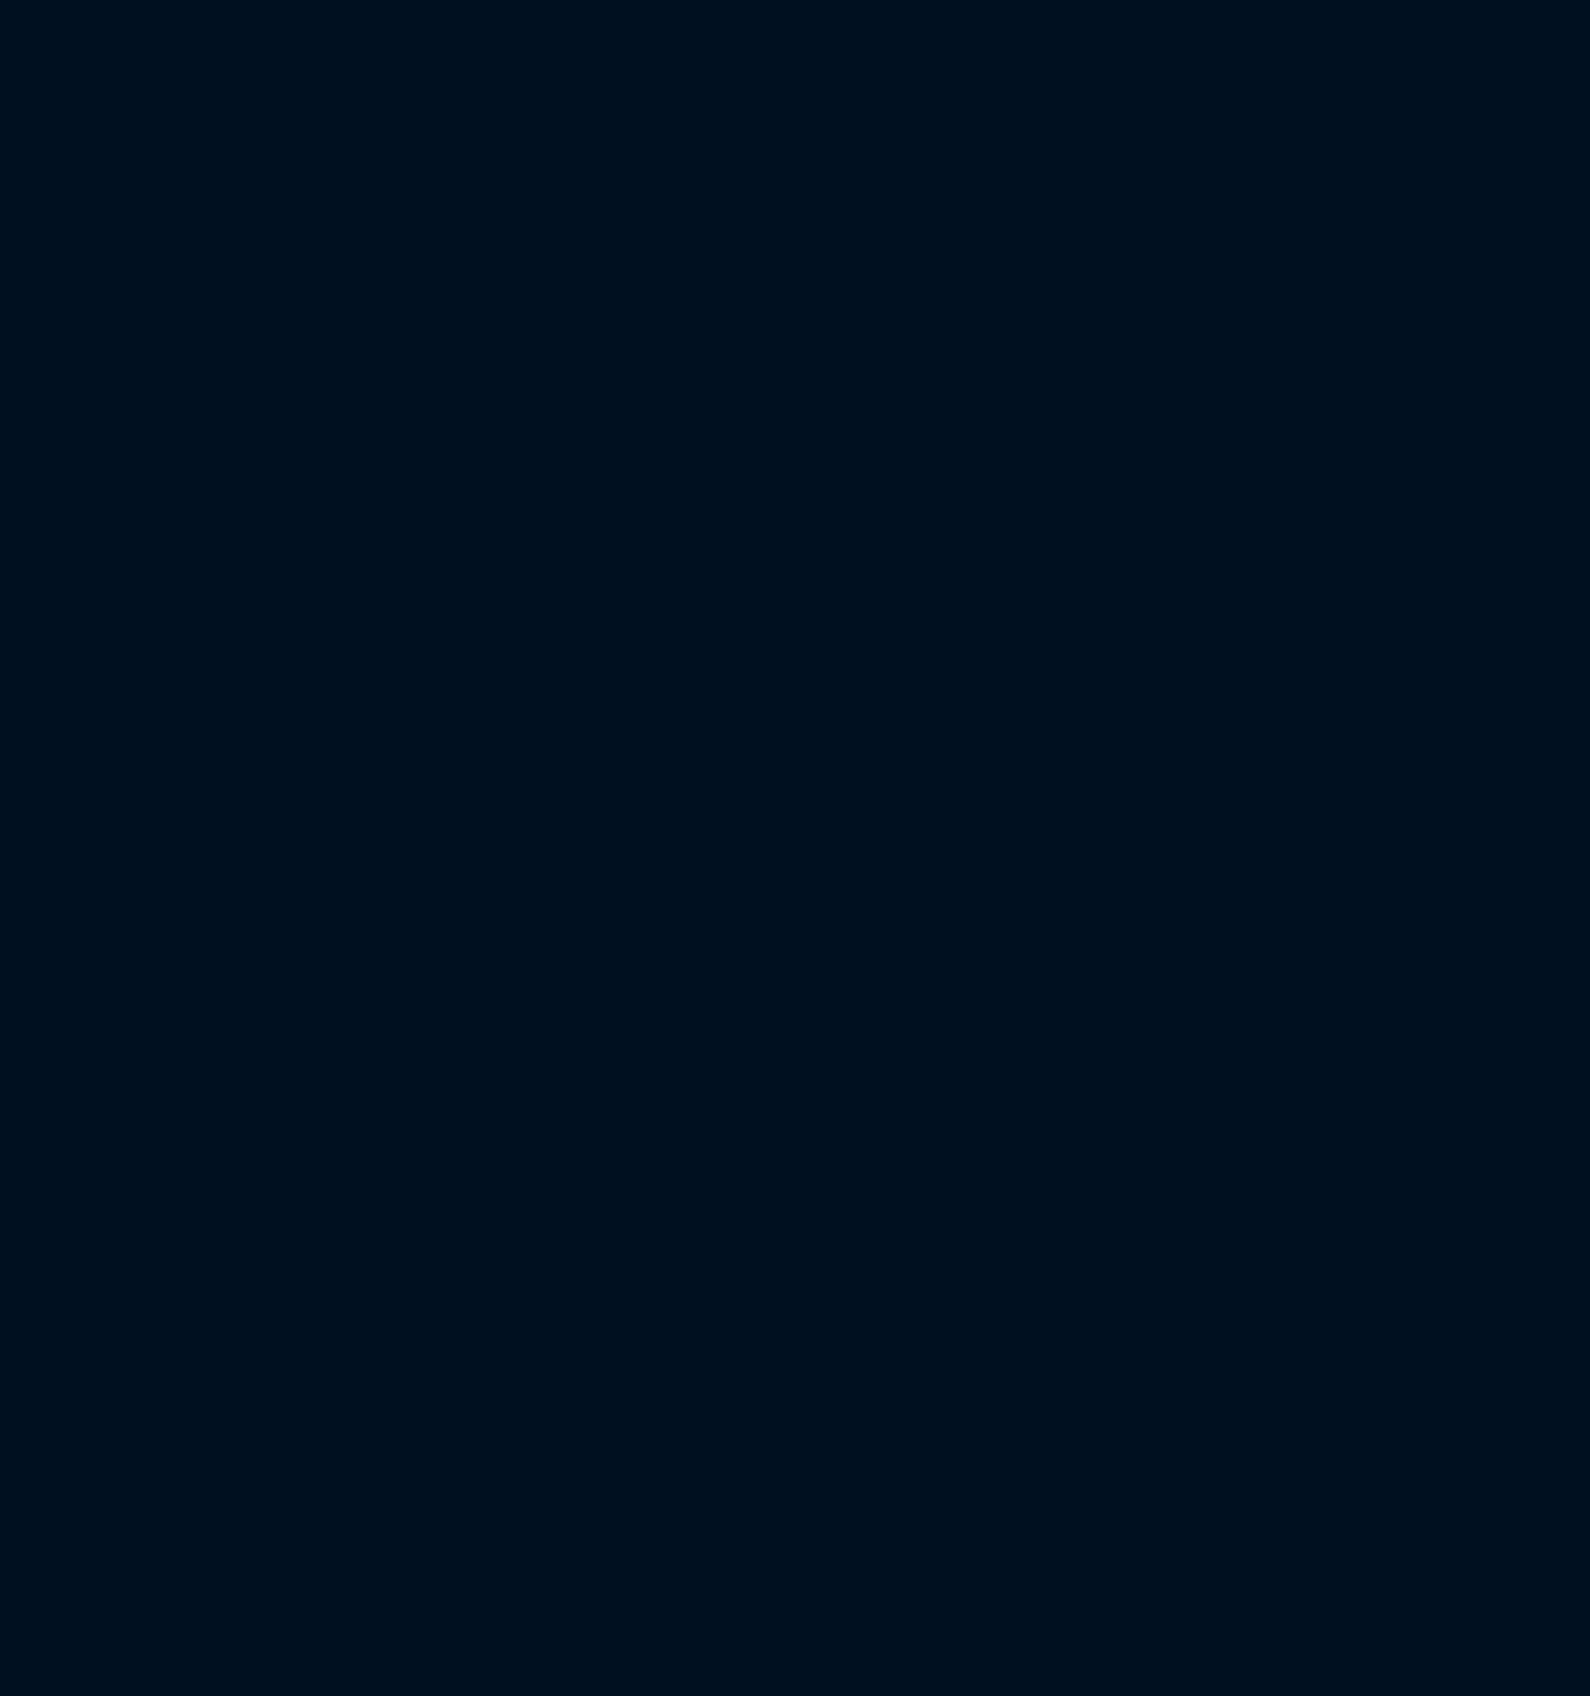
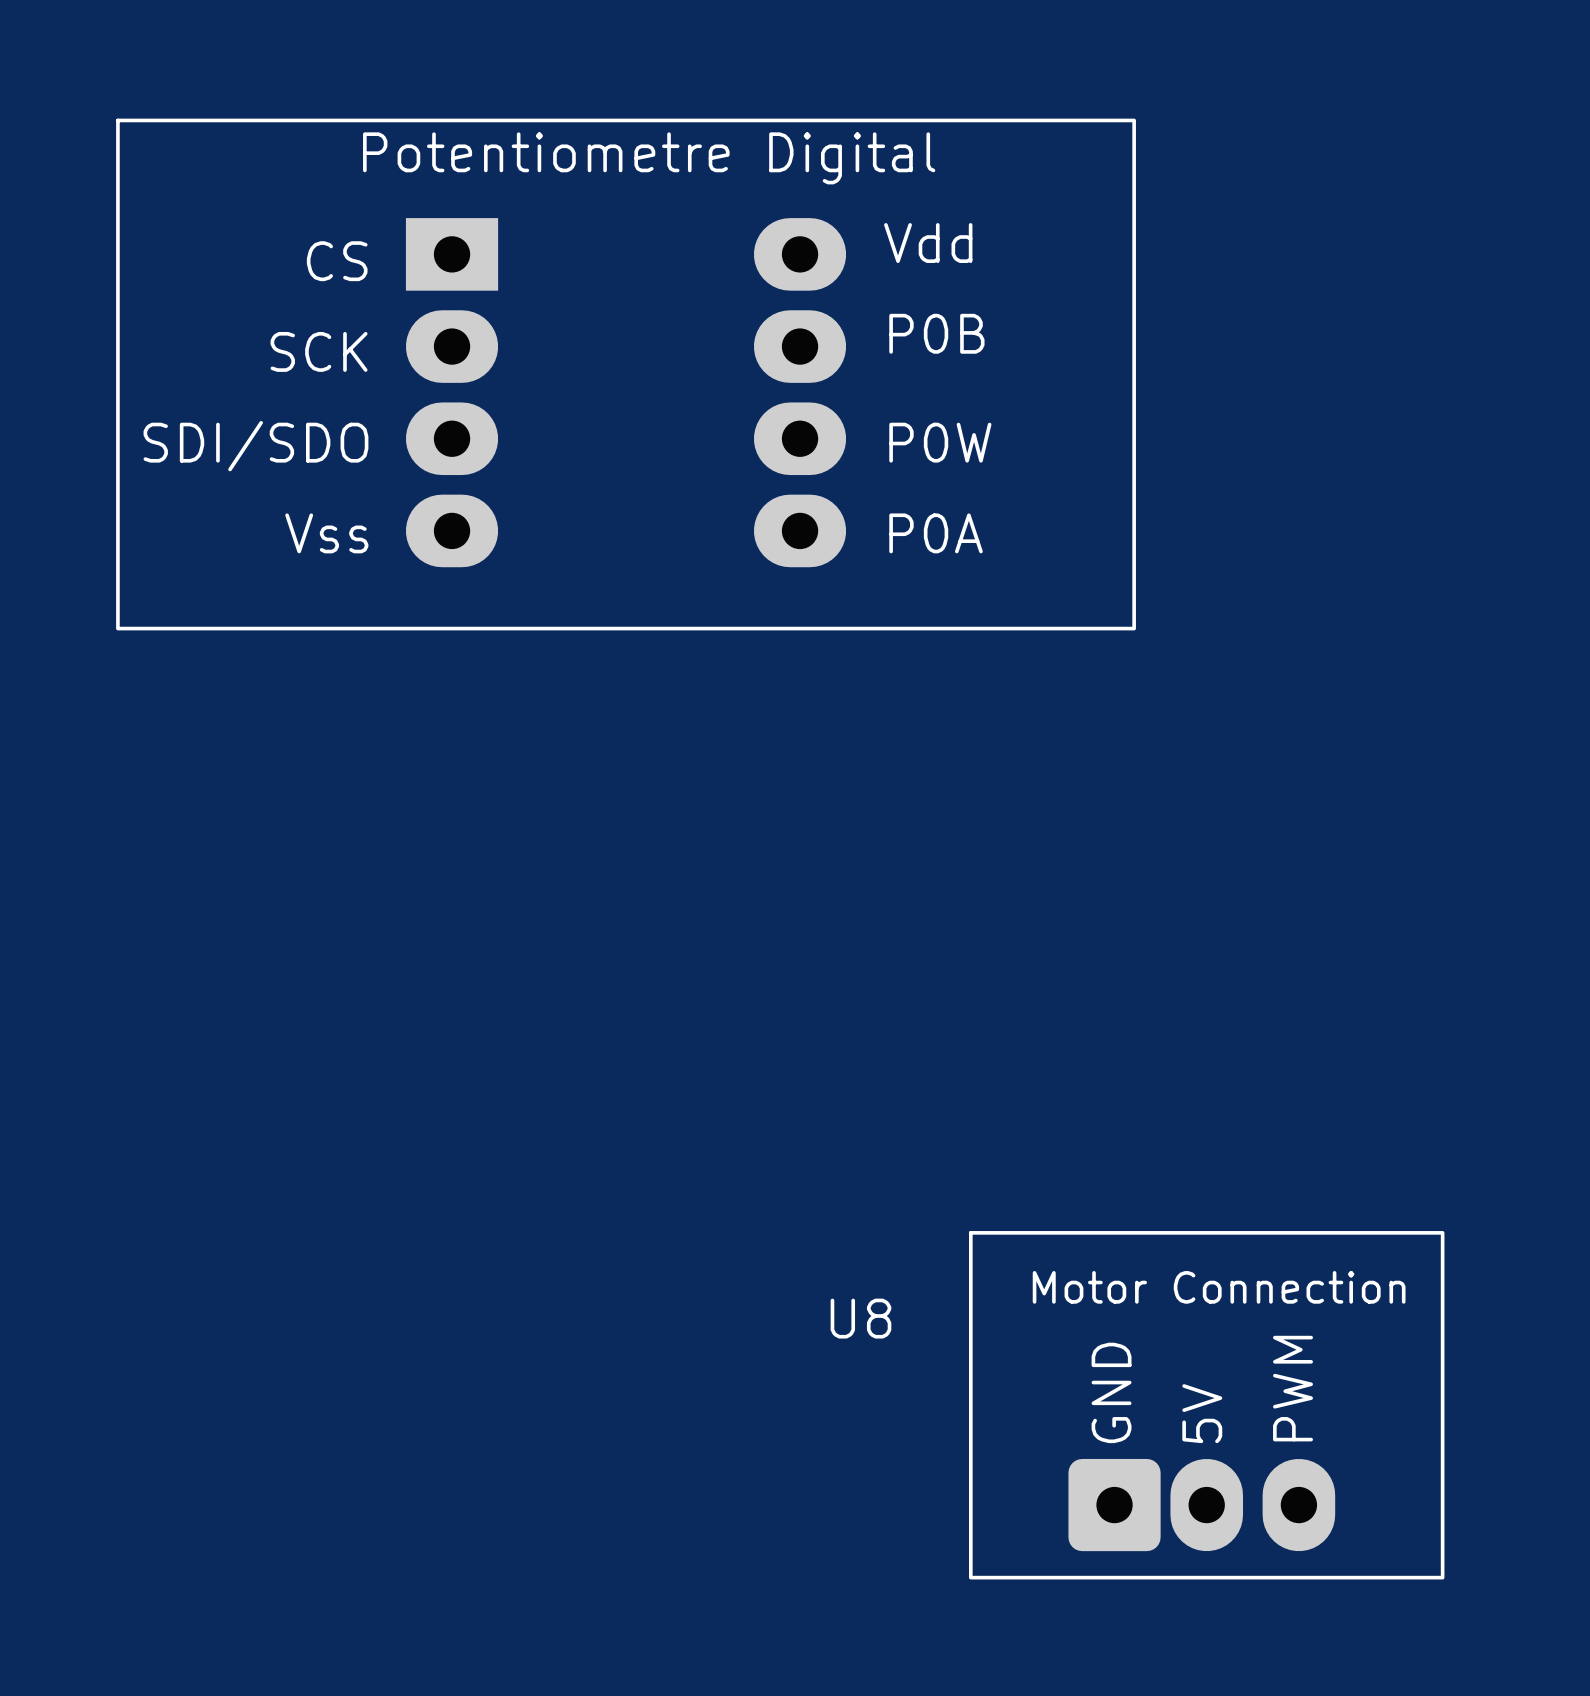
part: none -> (626, 374)
U8: none -> (1206, 1405)

